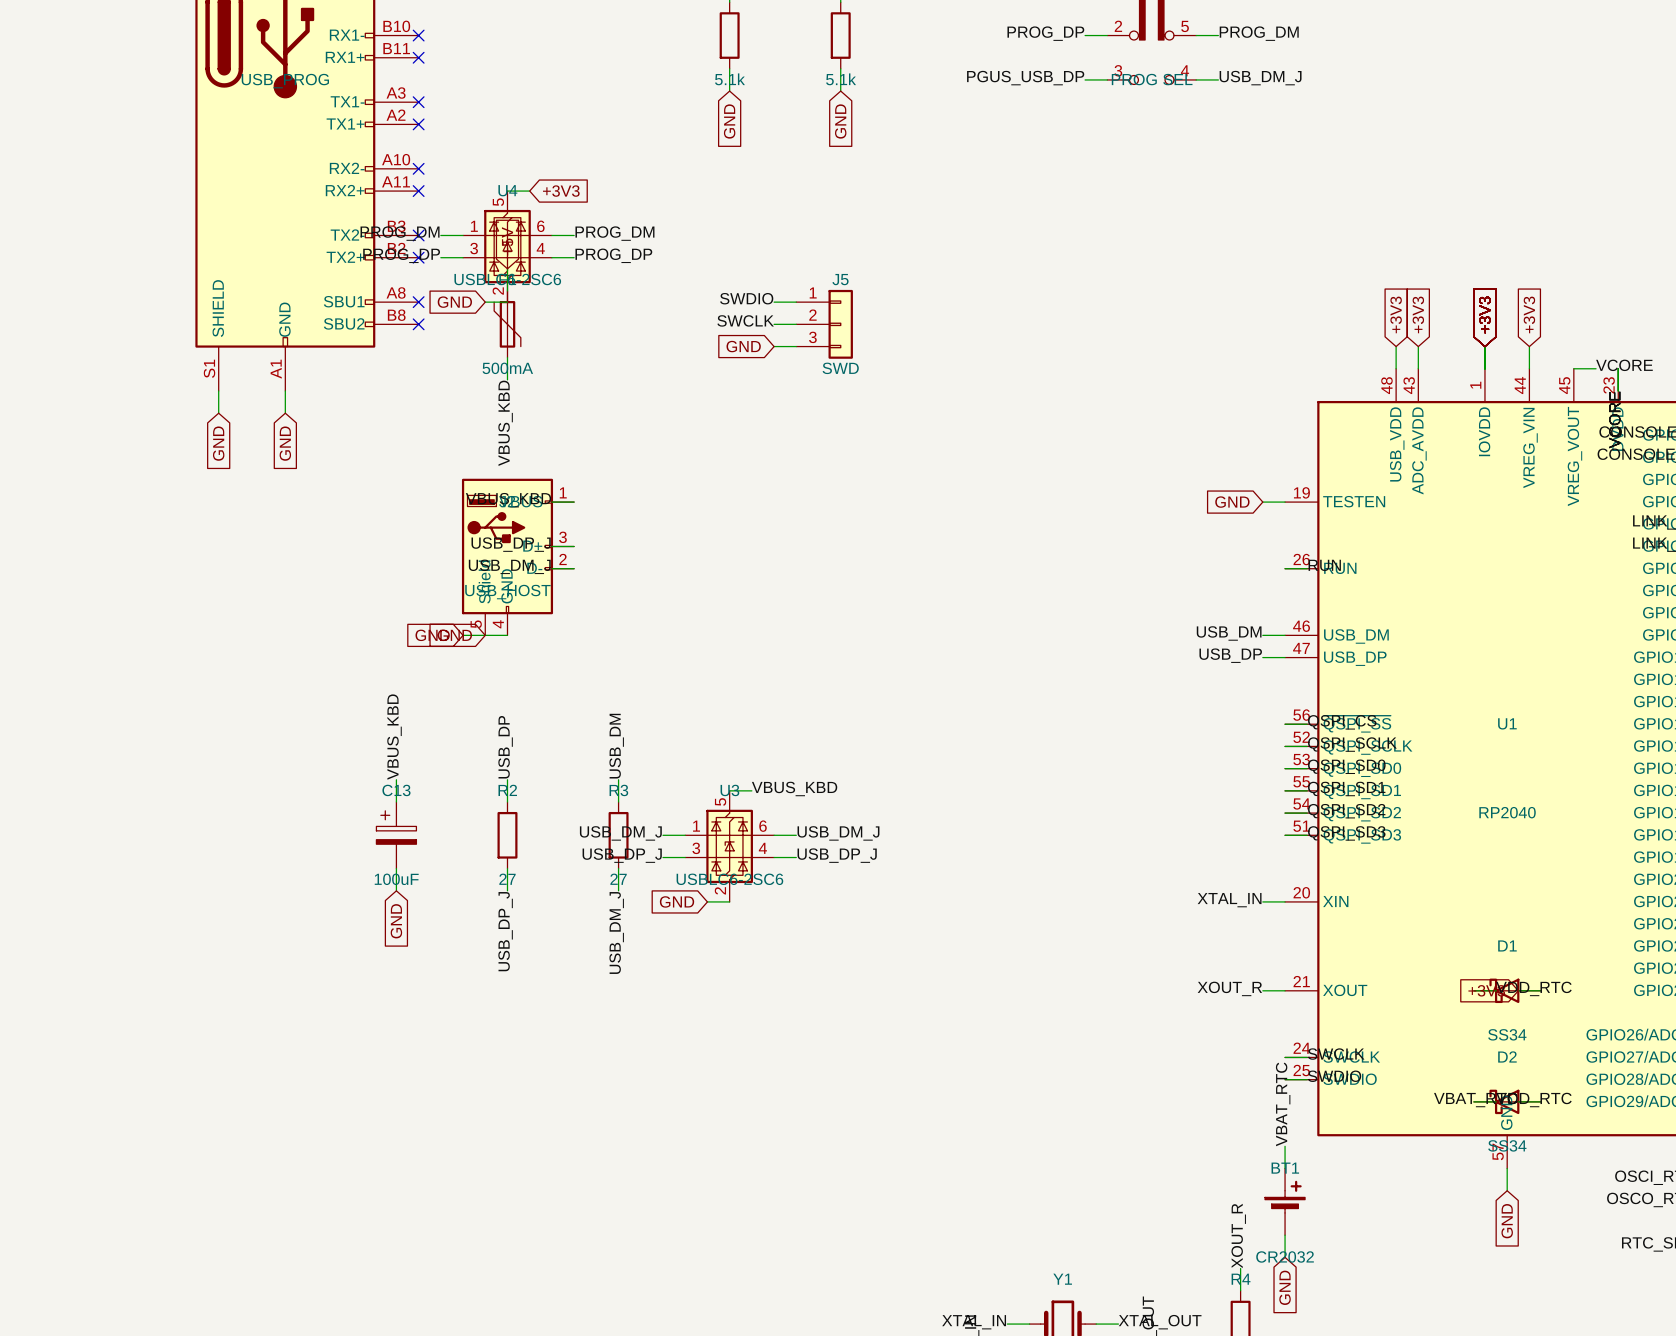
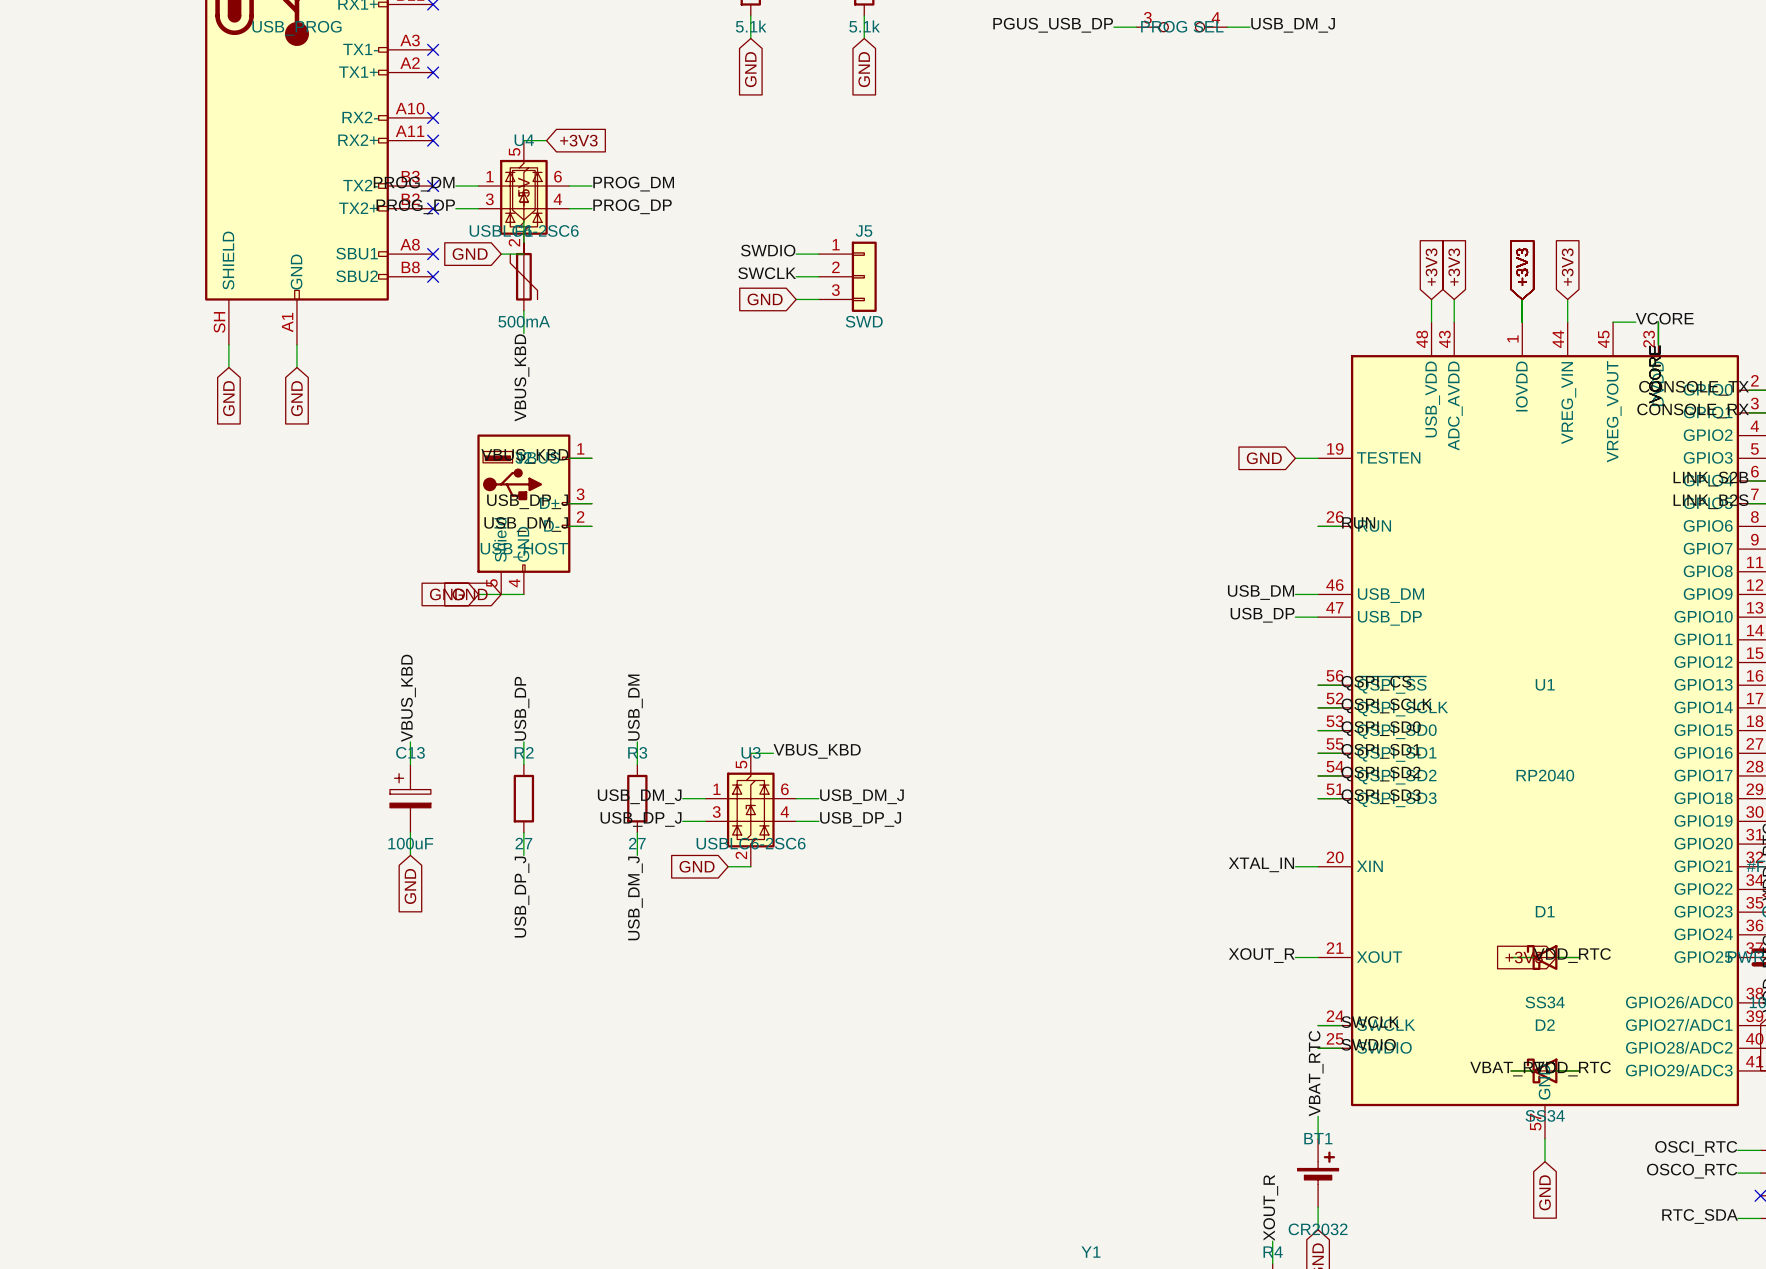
part pin number: S1 (209, 368) -> SH (219, 322)

